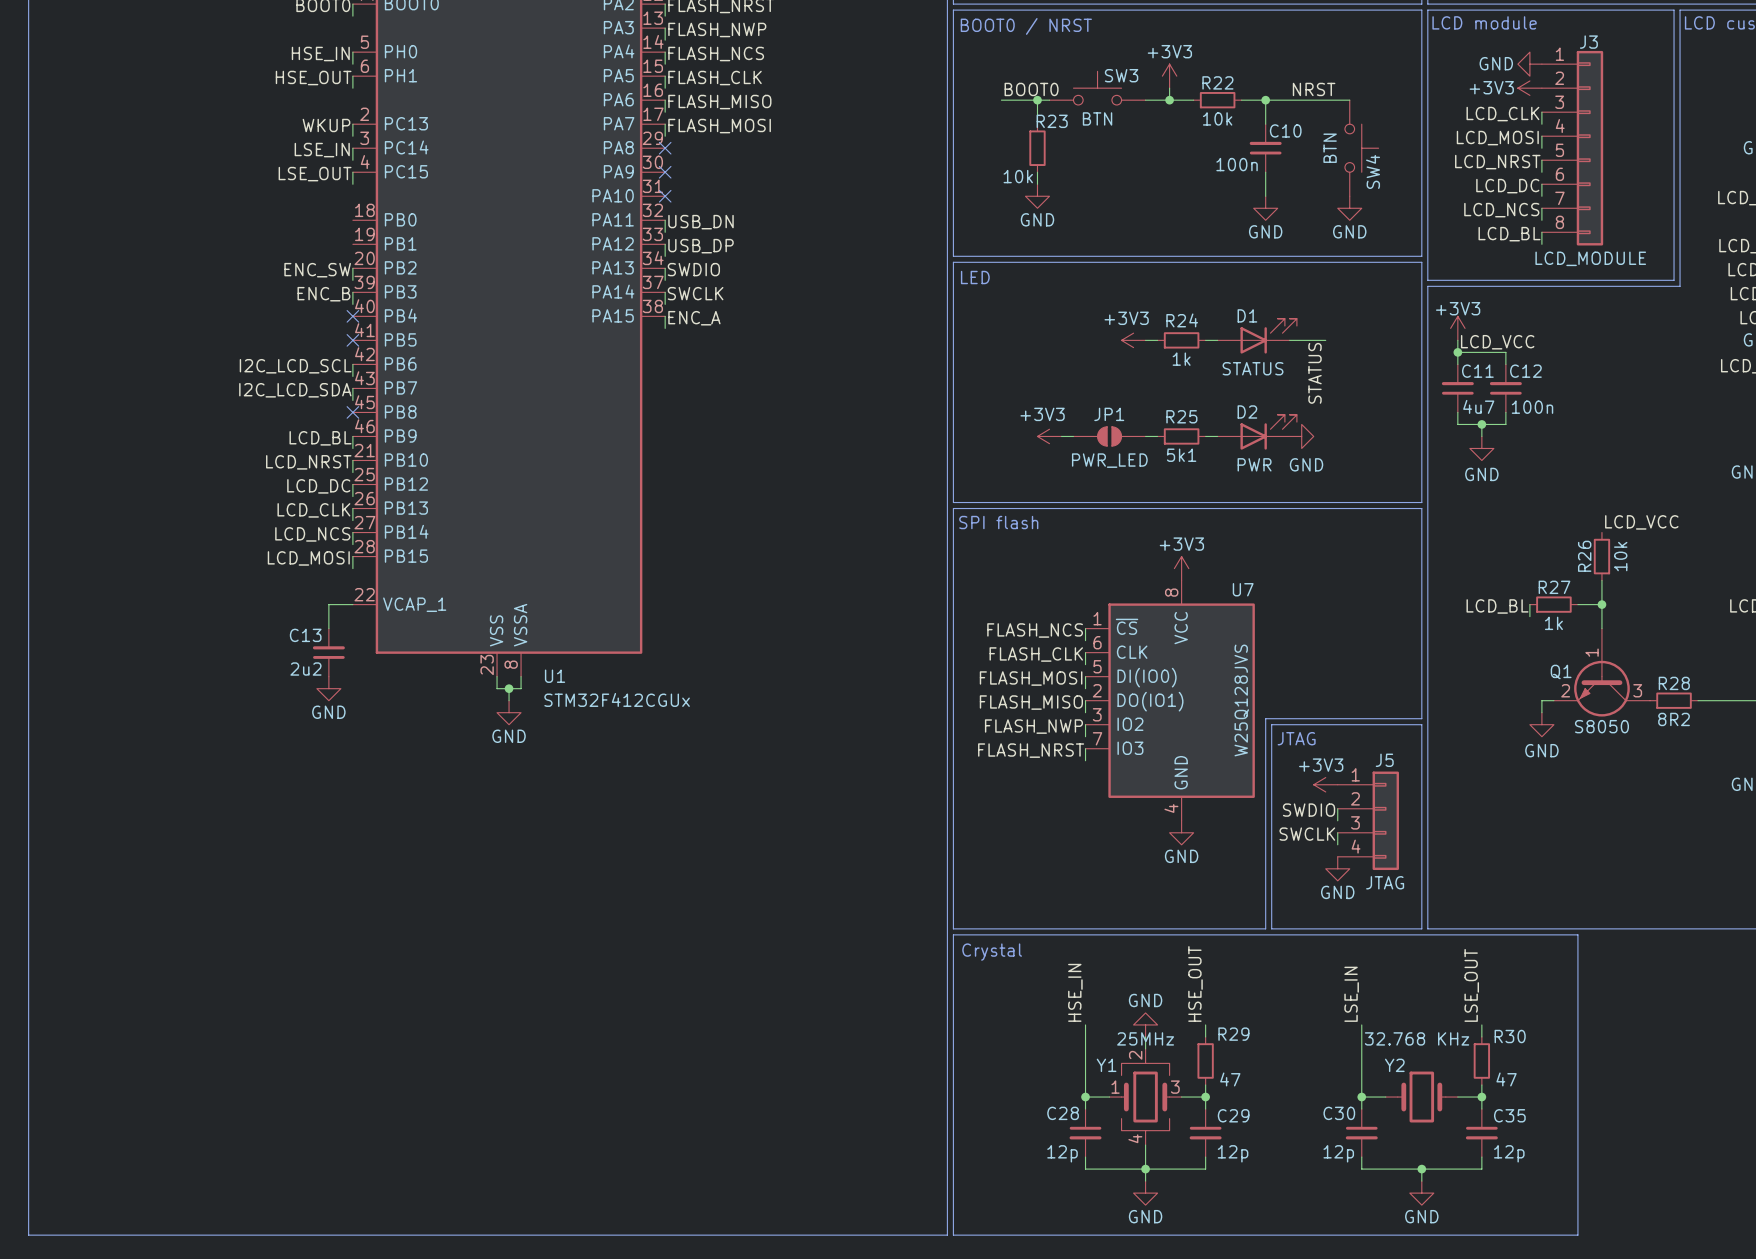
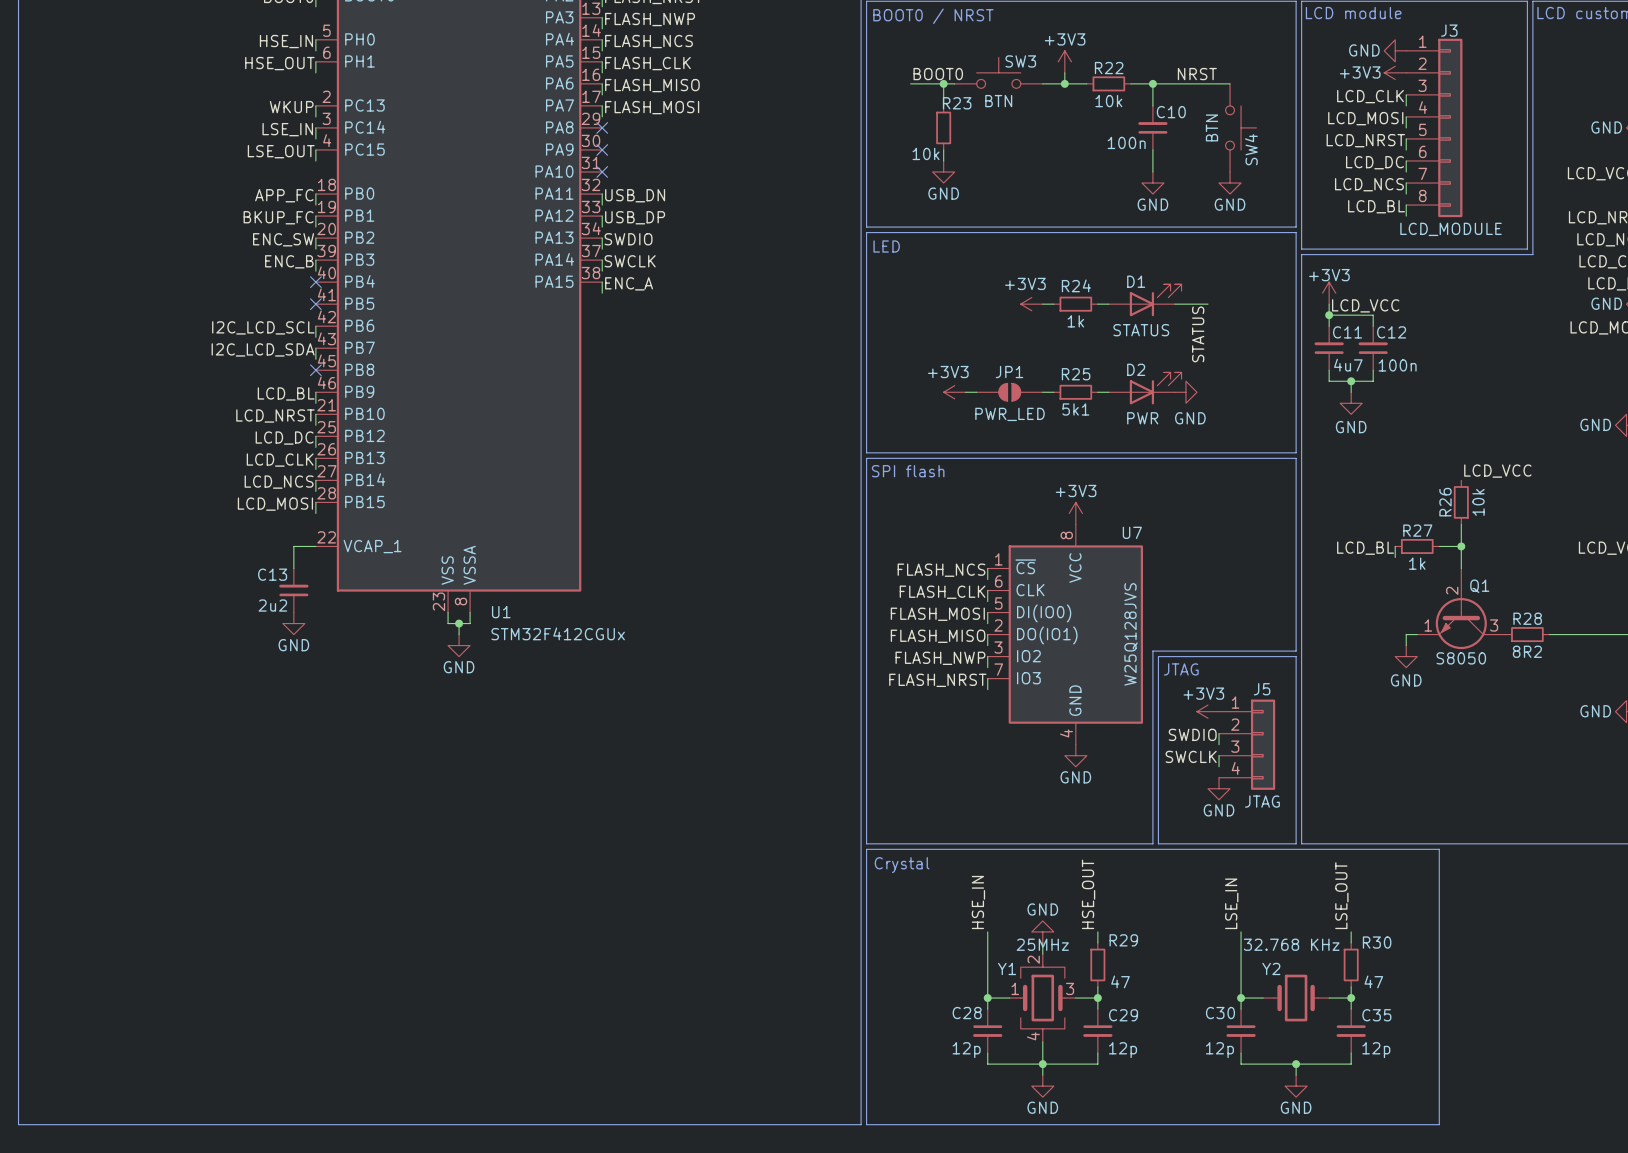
wire: none -> (315, 194) (315, 205)
label: none -> APP_FC (284, 195)
wire: none -> (315, 216) (315, 227)
label: none -> BKUP_FC (278, 217)
Q1 pin number: 1 (1592, 652) -> 2 (1452, 590)
Q1 name position: Q1 (1561, 671) -> Q1 (1479, 586)
Q1 pin number: 2 (1565, 690) -> 1 (1428, 625)

